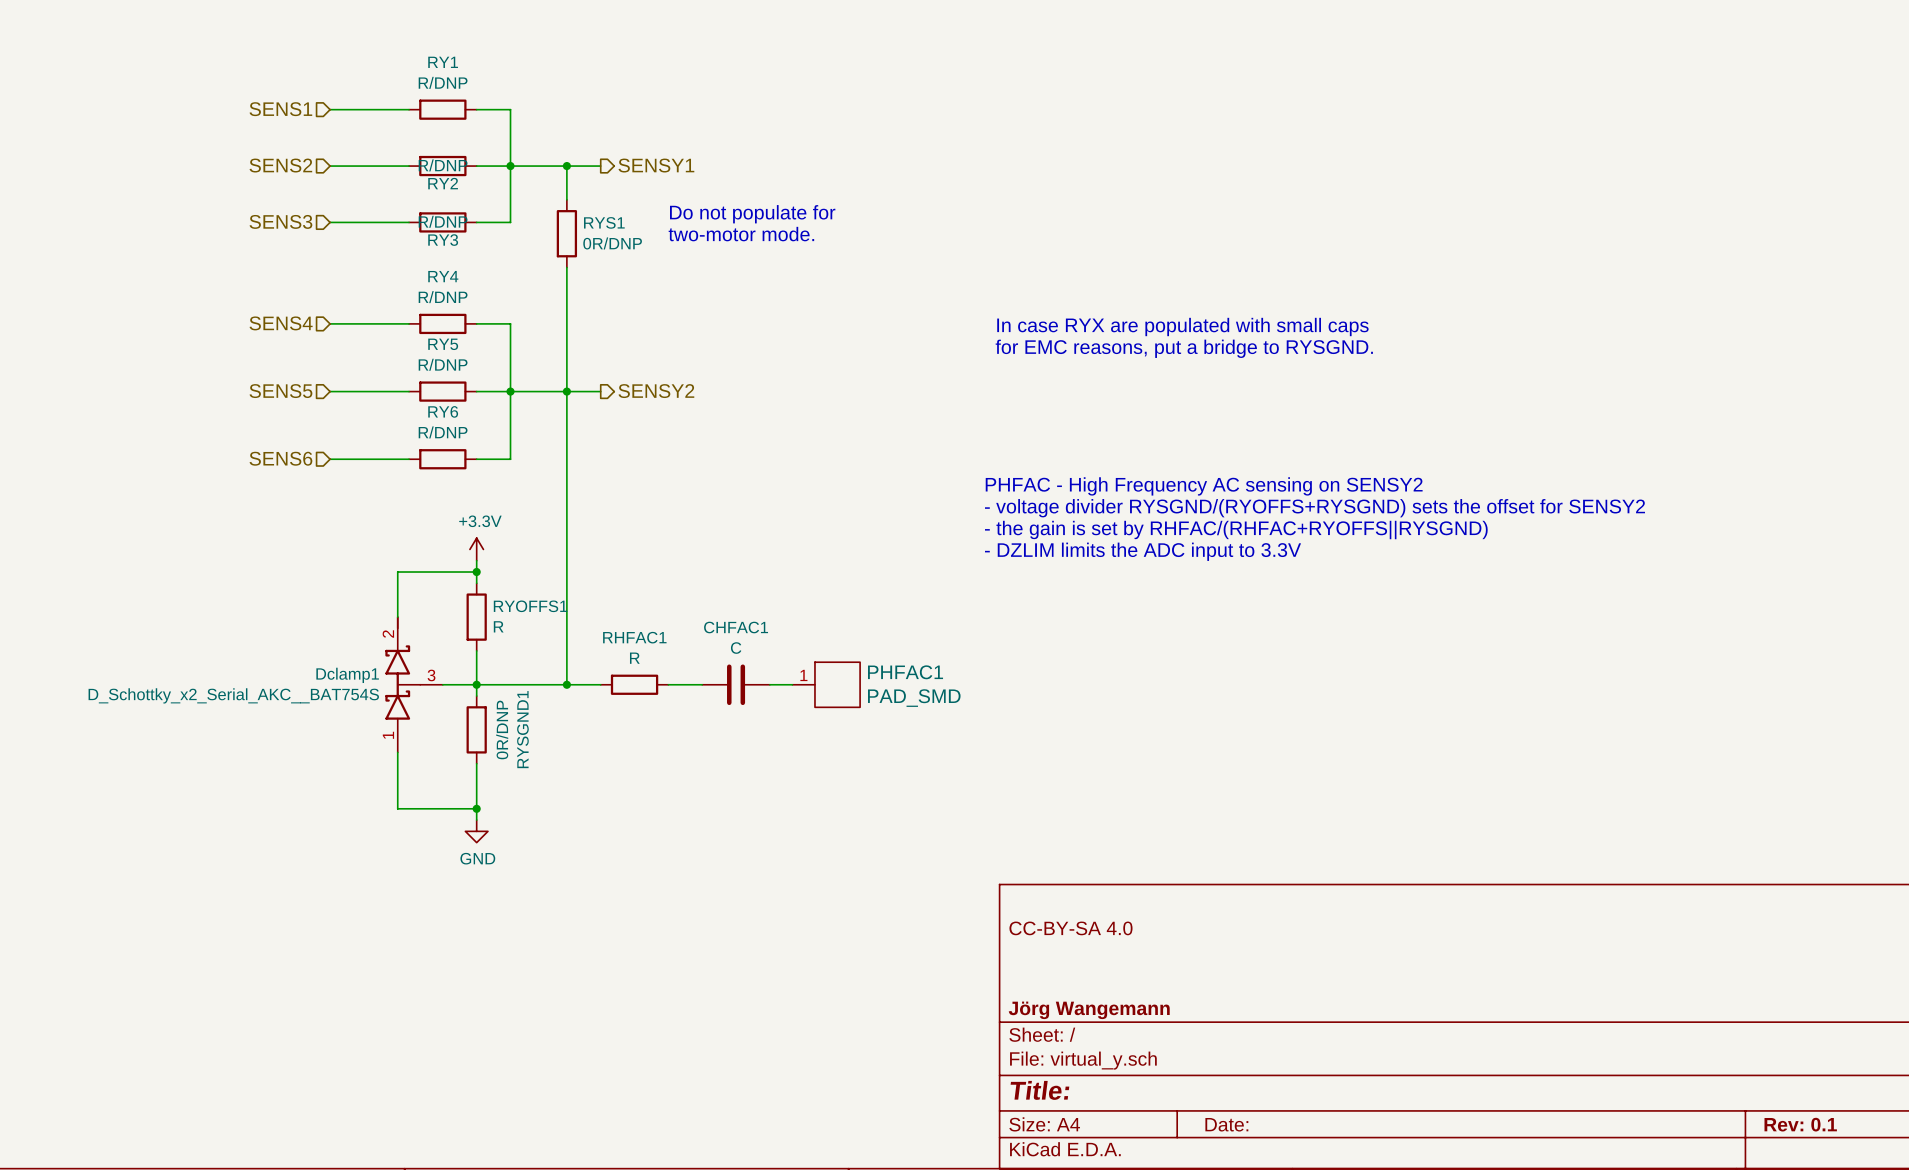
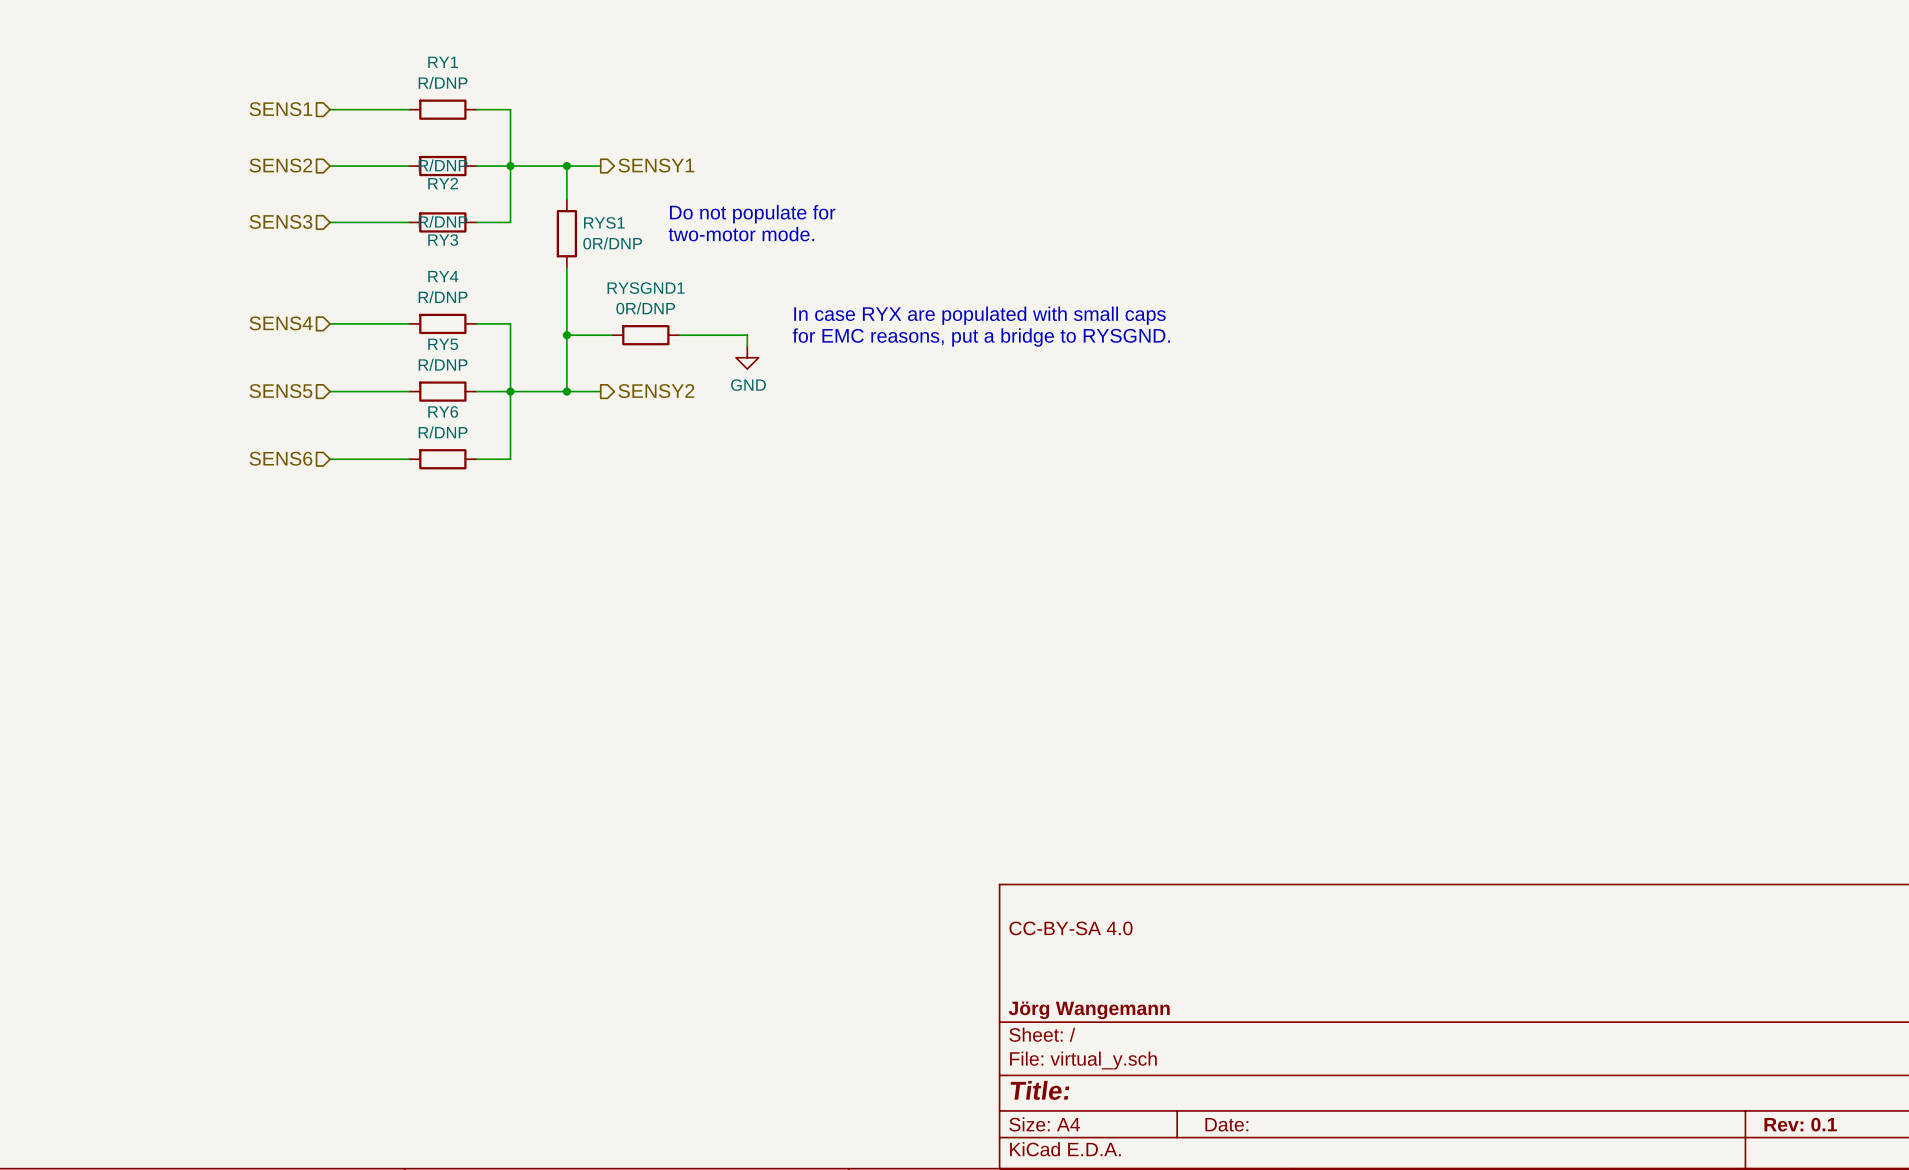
text position: In case RYX are populated with small caps (1182, 327) -> In case RYX are populated with small caps (979, 315)
wire: none -> (566, 335) (612, 335)
junction: none -> (566, 335)
wire: none -> (679, 335) (747, 335) (747, 346)
text position: for EMC reasons, put a bridge to RYSGND. (1184, 348) -> for EMC reasons, put a bridge to RYSGND. (981, 337)
power symbol: none -> GND (747, 357)
wire: (566, 391) (566, 684) -> none
text: PHFAC - High Frequency AC sensing on SENSY2 (1204, 486) -> none
text: - voltage divider RYSGND/(RYOFFS+RYSGND) sets the offset for SENSY2 (1315, 508) -> none
text: - the gain is set by RHFAC/(RHFAC+RYOFFS||RYSGND) (1236, 530) -> none
power symbol: +3.3V (476, 549) -> none
text: - DZLIM limits the ADC input to 3.3V (1143, 551) -> none
wire: (476, 560) (476, 583) -> none
wire: (476, 572) (397, 572) (397, 617) -> none
junction: (476, 572) -> none
RYOFFS1: R (476, 617) -> none
wire: (476, 650) (476, 696) -> none
Dclamp1: D_Schottky_x2_Serial_AKC__BAT754S (414, 684) -> none
wire: (442, 684) (600, 684) -> none
junction: (476, 684) -> none
junction: (566, 684) -> none
RHFAC1: R (634, 684) -> none
wire: (668, 684) (702, 684) -> none
CHFAC1: C (736, 684) -> none
wire: (769, 684) (792, 684) -> none
PHFAC1: PAD_SMD (826, 684) -> none
RYSGND1 rotation: 0° (476, 729) -> 90° clockwise (645, 335)
RYSGND1 position: (476, 729) -> (645, 335)
RYSGND1 value position: 0R/DNP (502, 729) -> 0R/DNP (645, 308)
RYSGND1 name position: RYSGND1 (522, 729) -> RYSGND1 (646, 288)
wire: (397, 752) (397, 808) (476, 808) -> none
wire: (476, 763) (476, 820) -> none
junction: (476, 808) -> none
power symbol: GND (476, 831) -> none

